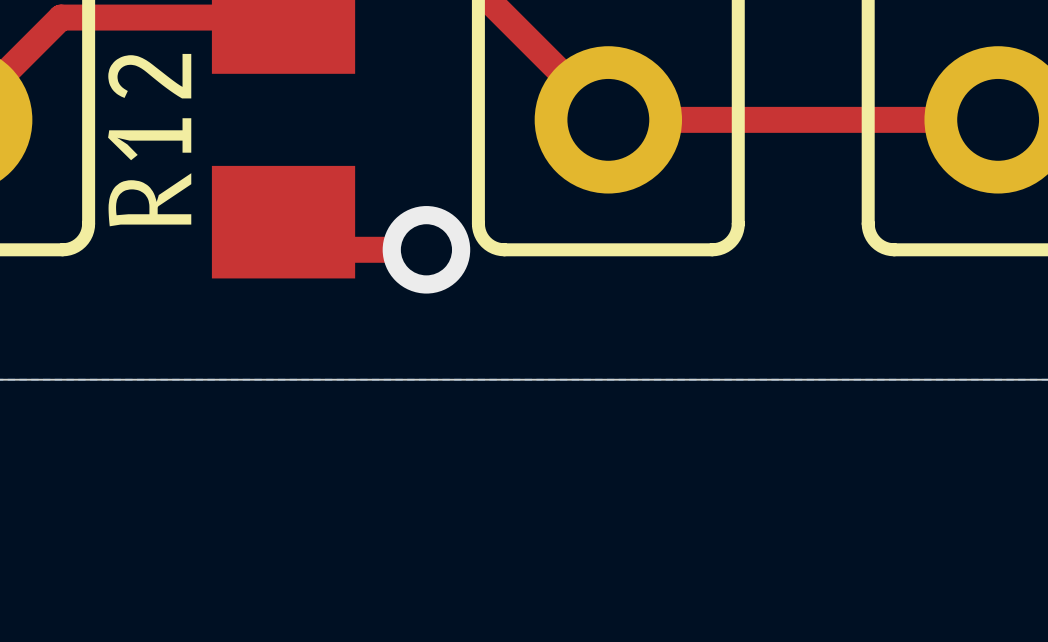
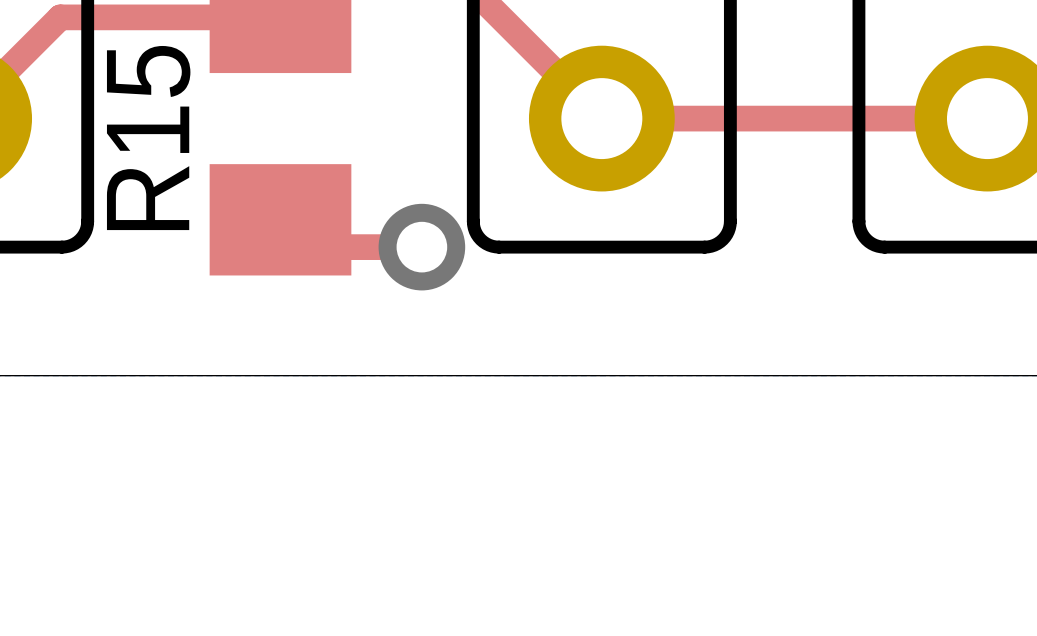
R12 name: R12 (149, 140) -> R15 (148, 138)

